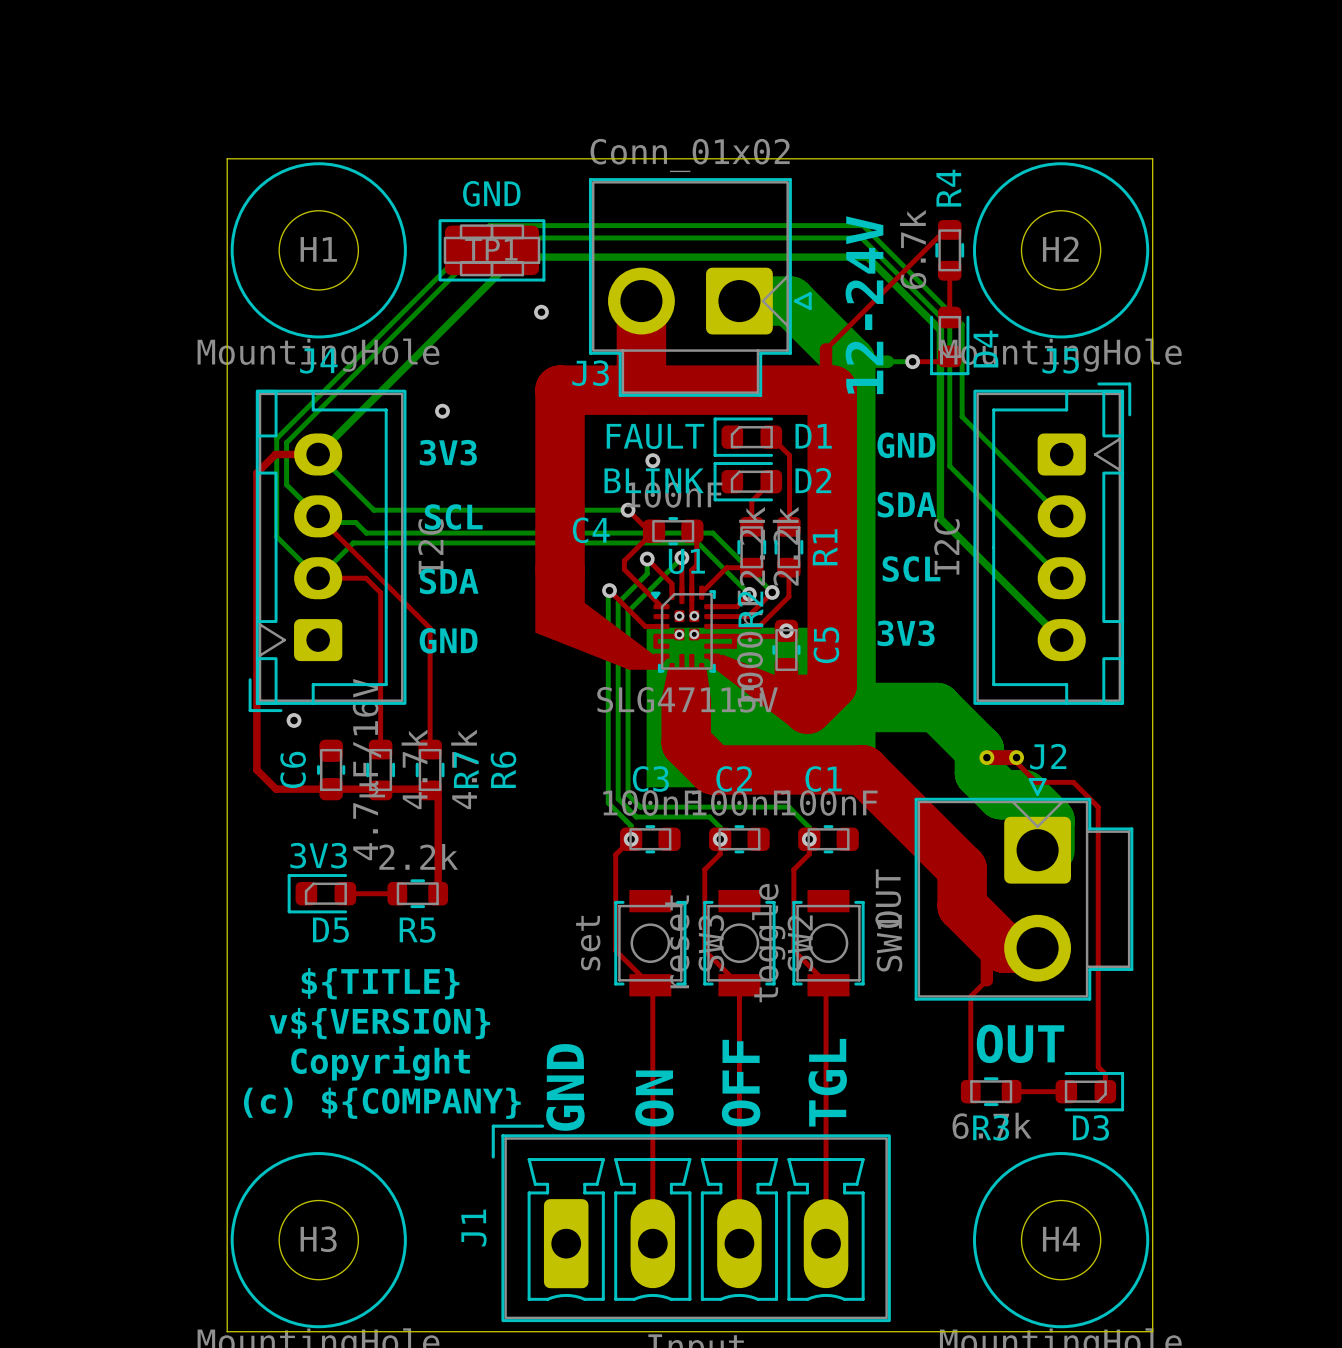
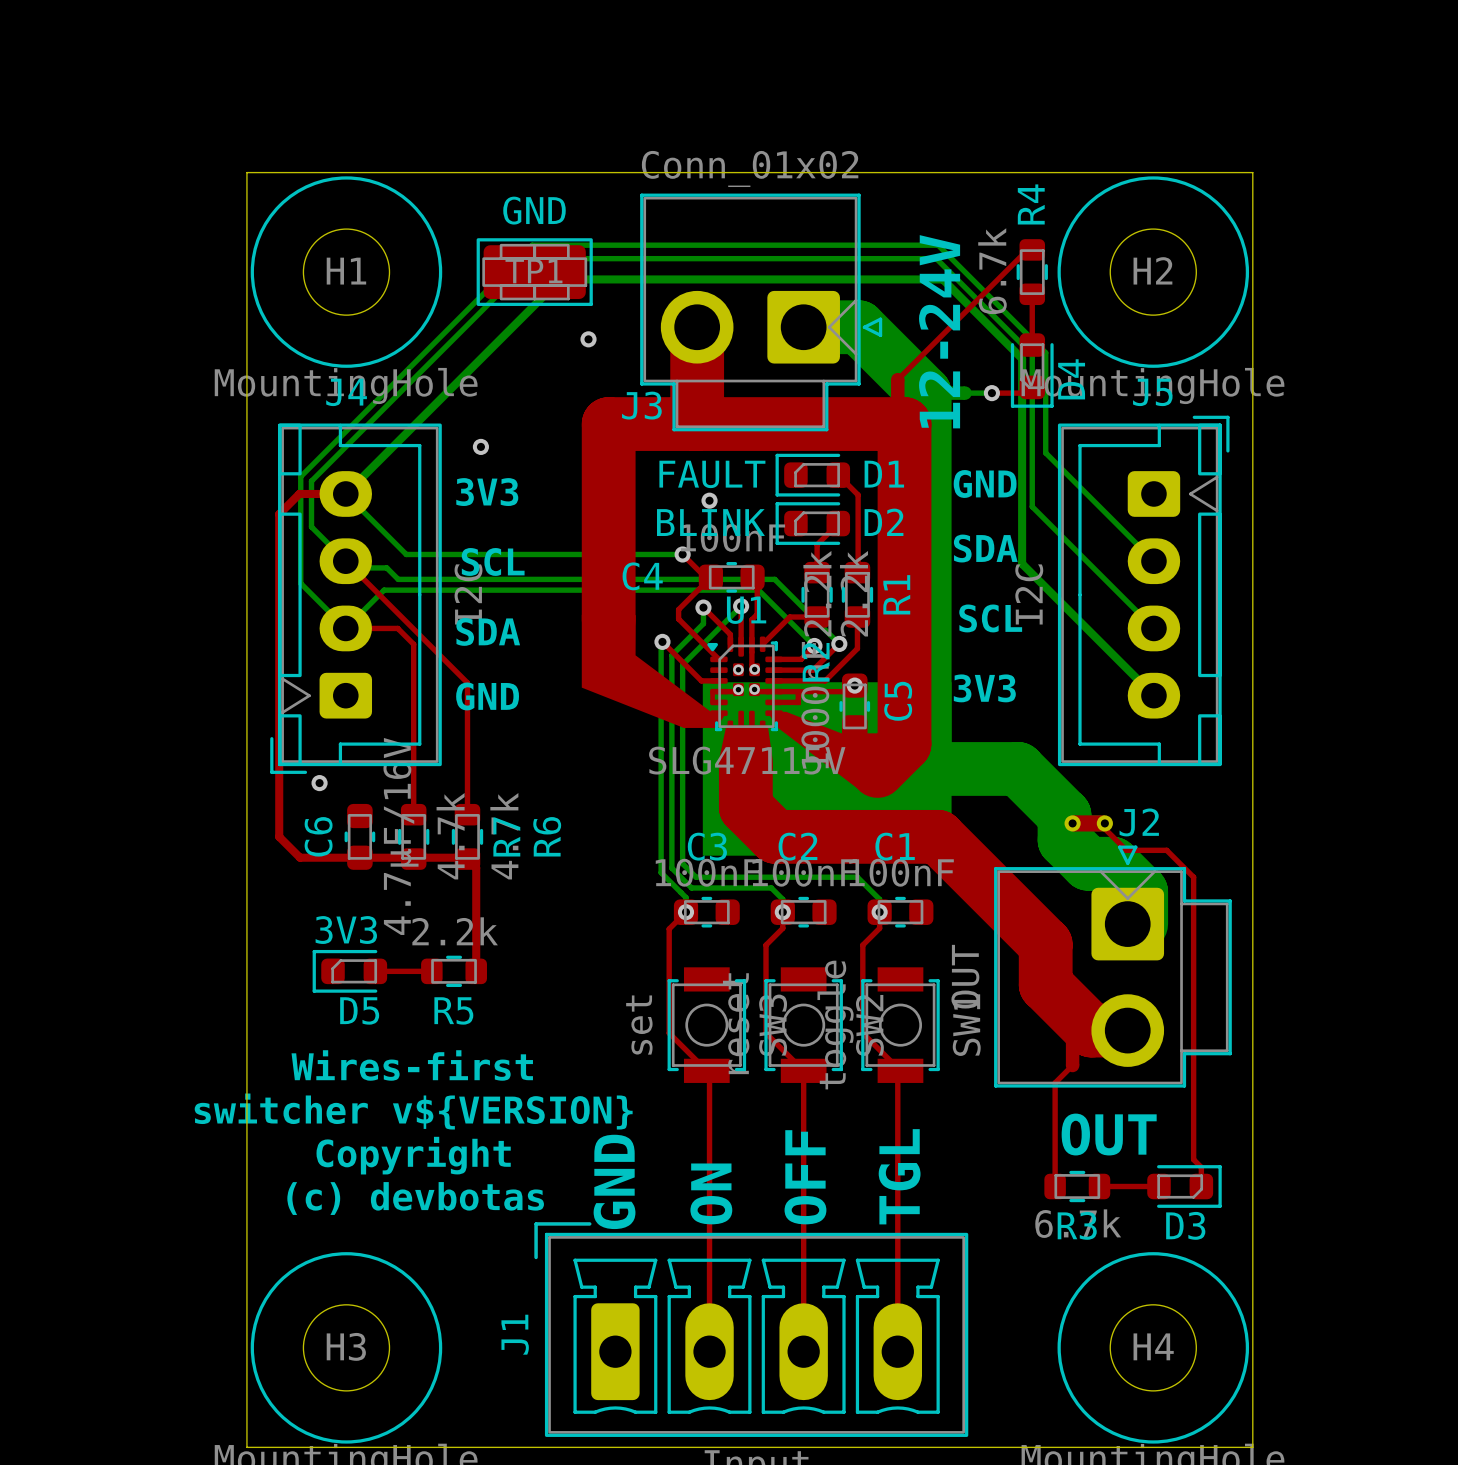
text: ${TITLE} (380, 983) -> Wires-first (412, 1065)
text: v${VERSION} (379, 1023) -> switcher v${VERSION} (413, 1111)
text: (c) ${COMPANY} (382, 1103) -> (c) devbotas (415, 1198)

